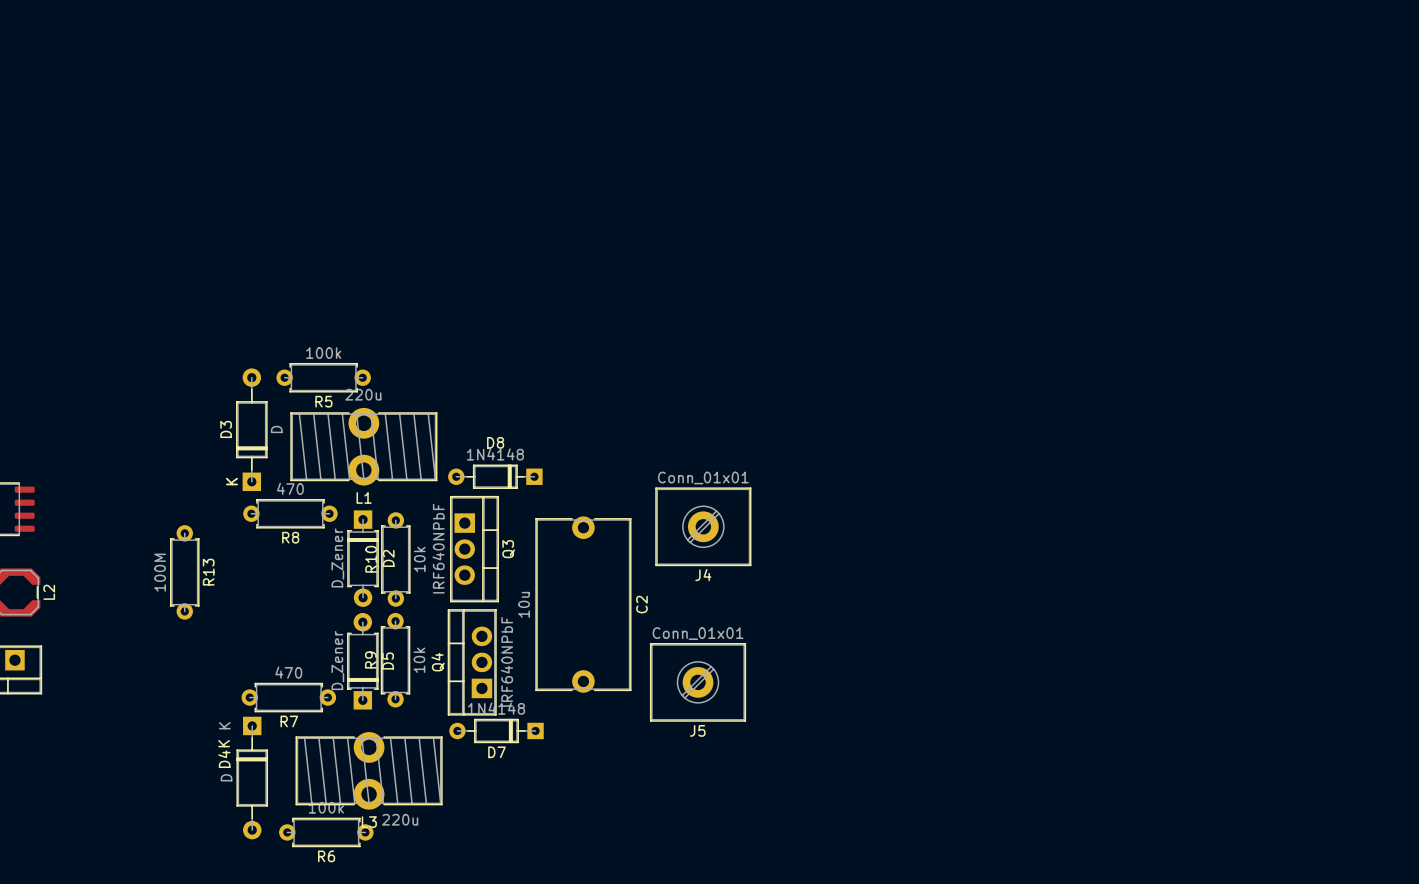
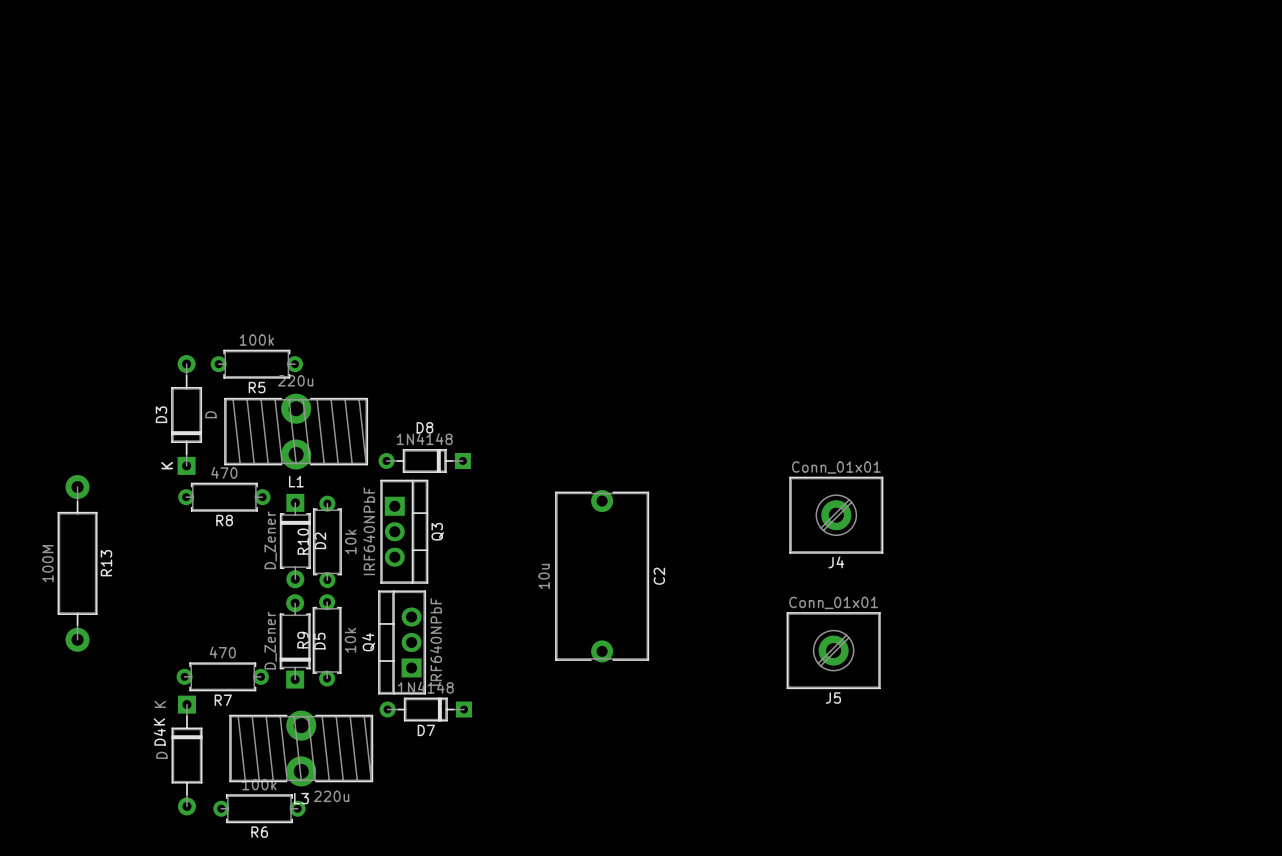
R13 footprint: [170, 525, 200, 620] -> [57, 475, 98, 652]
J4 position: (703, 526) -> (836, 515)
C2 position: (583, 604) -> (602, 576)
J5 position: (698, 682) -> (833, 650)

